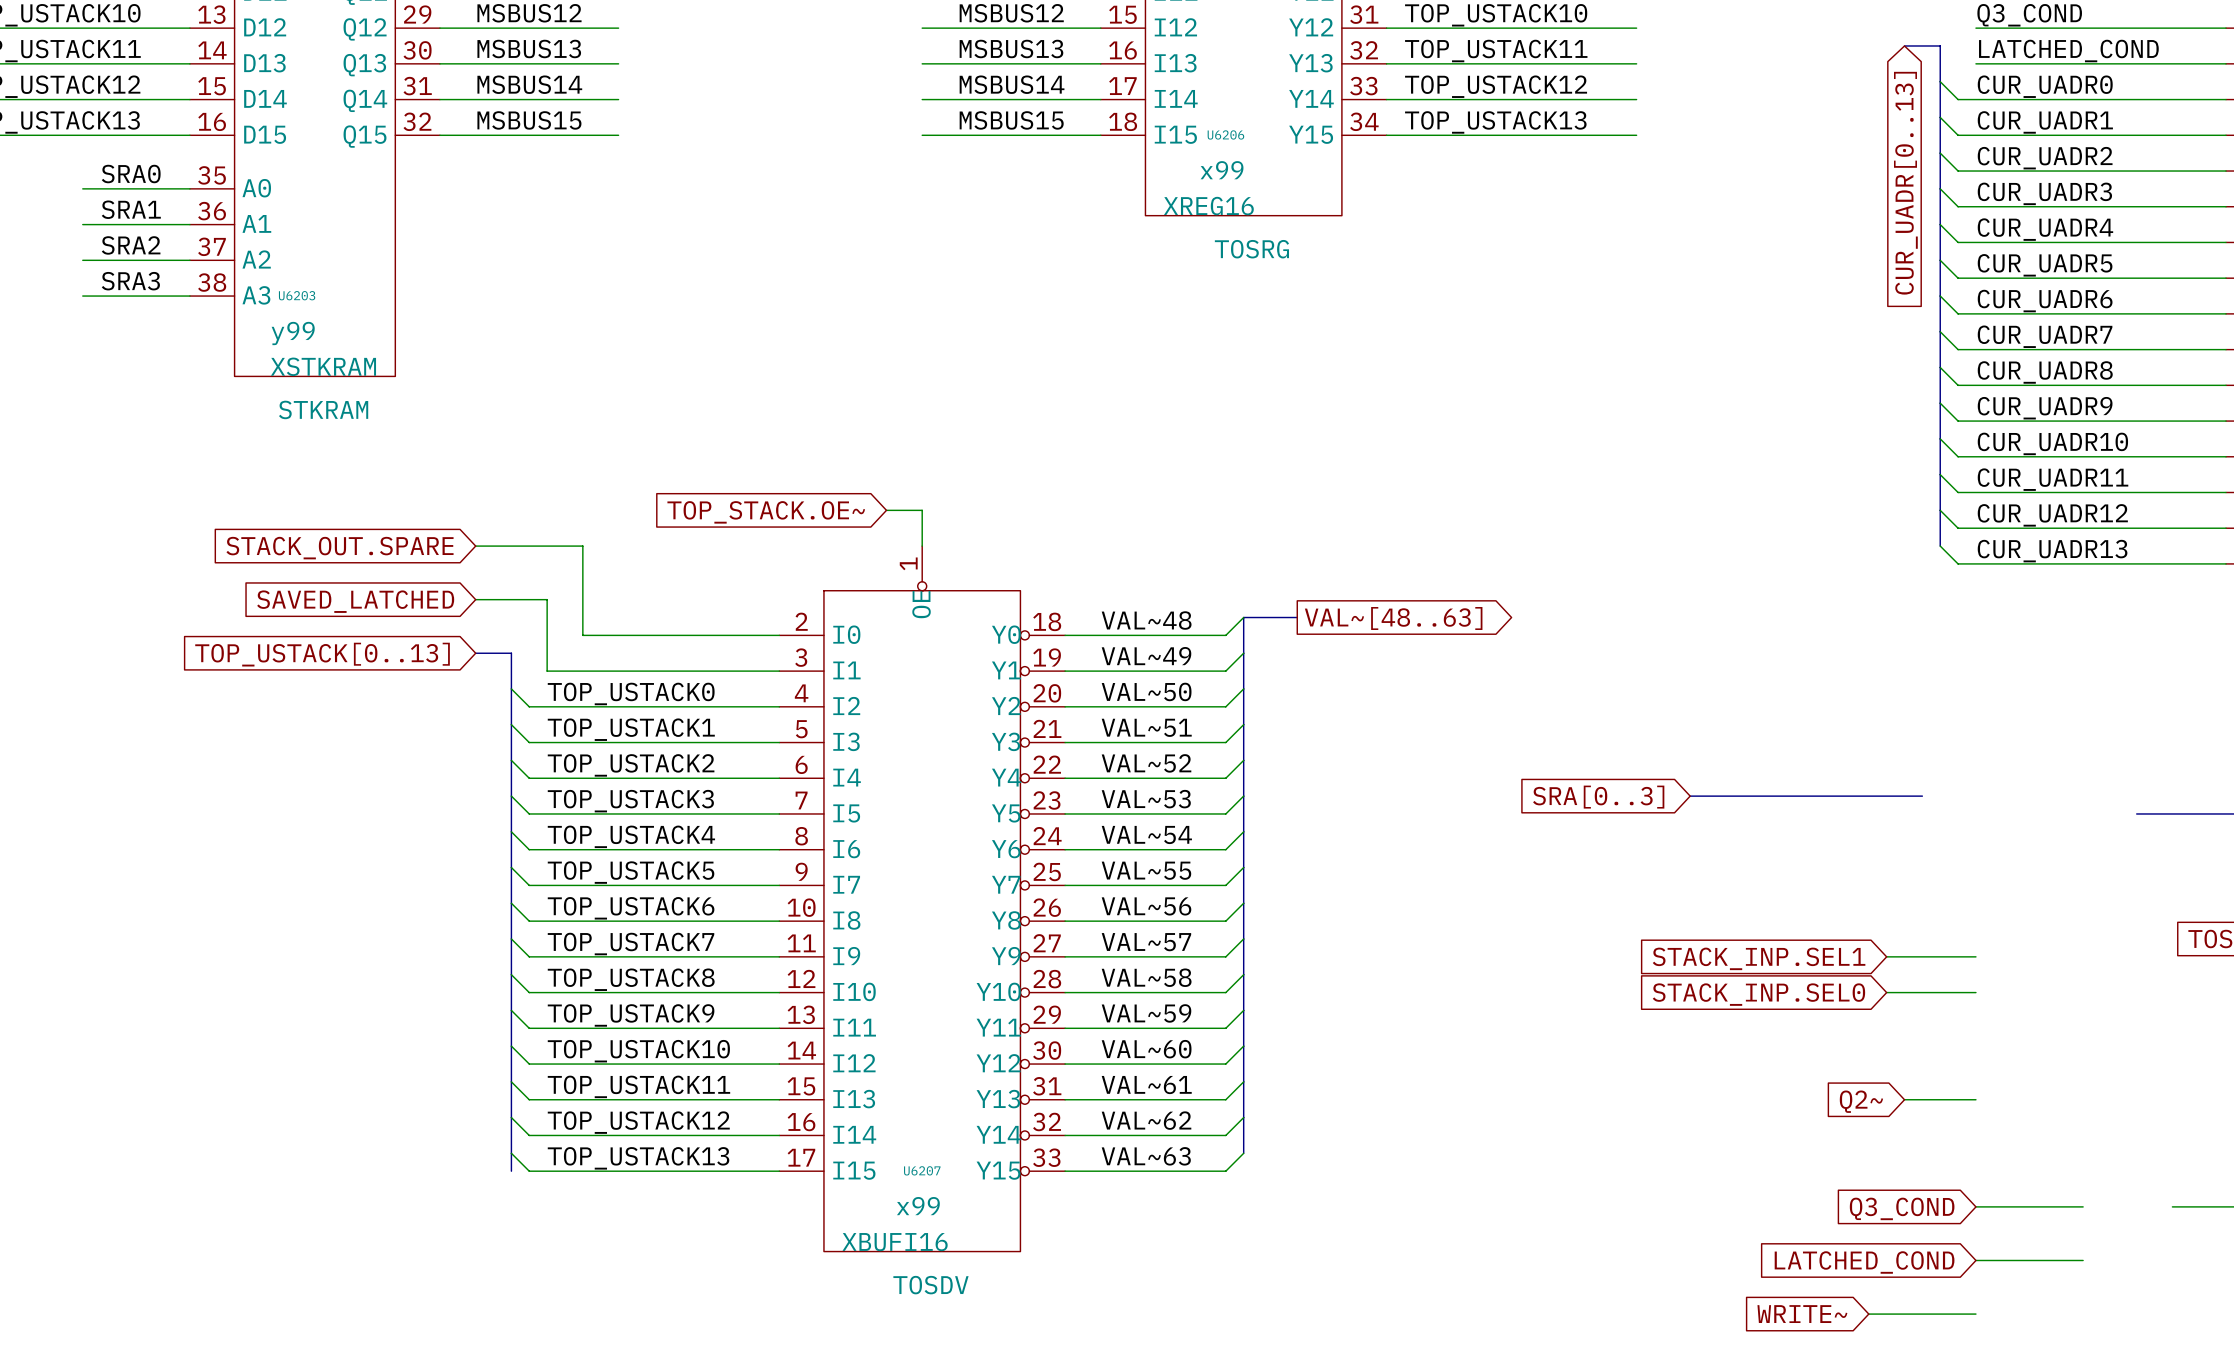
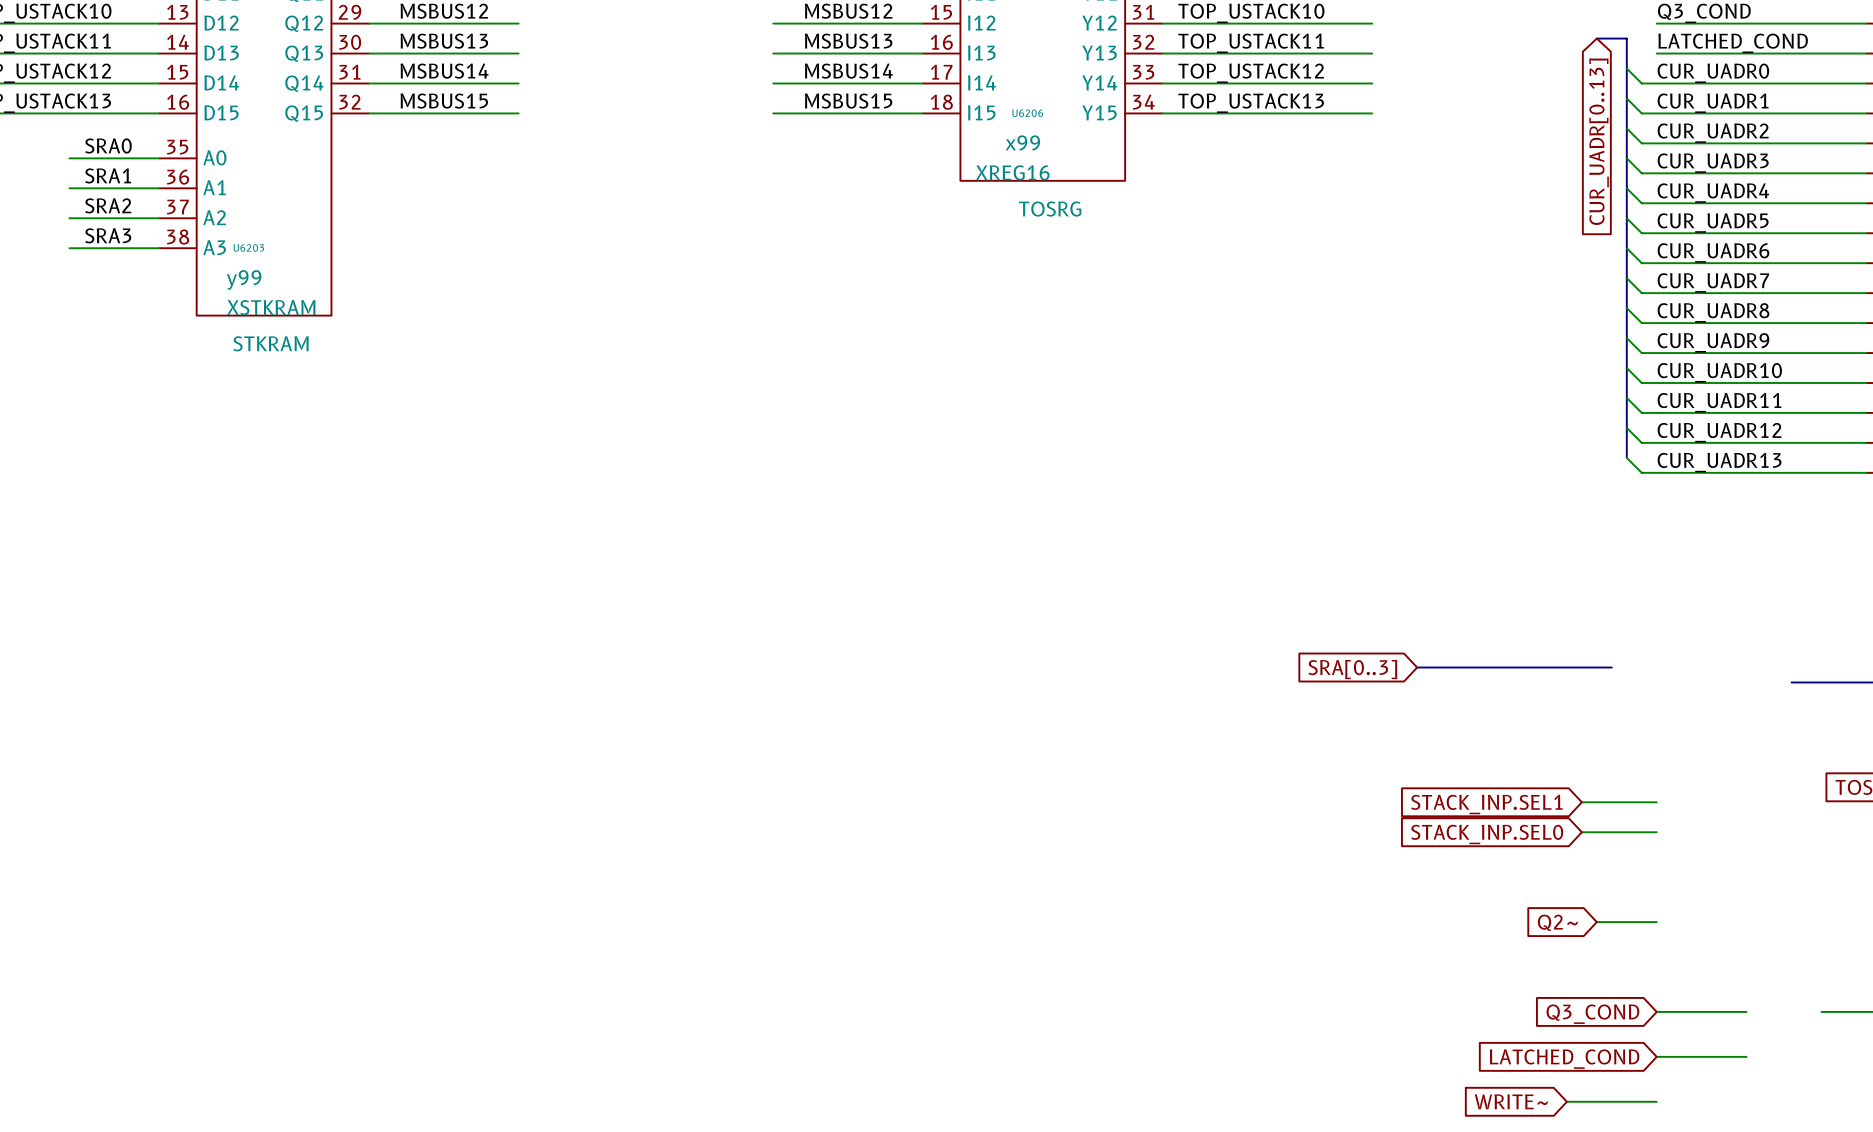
wire: (886, 510) (922, 510) (922, 546) -> none
global label: TOP_STACK.OE~ (766, 512) -> none
wire: (475, 546) (582, 546) (582, 635) (779, 635) -> none
global label: STACK_OUT.SPARE (340, 548) -> none
wire: (475, 599) (547, 599) (547, 671) (779, 671) -> none
global label: SAVED_LATCHED (355, 601) -> none
wire: (1243, 617) (1225, 635) (1065, 635) -> none
bus: (1297, 617) (1243, 617) (1243, 1153) -> none
global label: VAL~[48..63] (1393, 618) -> none
label: VAL~48 (1146, 620) -> none
bus: (475, 653) (511, 653) (511, 1171) -> none
wire: (1243, 653) (1225, 671) (1065, 671) -> none
global label: TOP_USTACK[0..13] (322, 654) -> none
label: VAL~49 (1146, 656) -> none
wire: (511, 688) (529, 706) (779, 706) -> none
wire: (1243, 688) (1225, 706) (1065, 706) -> none
label: VAL~50 (1146, 691) -> none
label: TOP_USTACK0 (631, 693) -> none
wire: (511, 724) (529, 742) (779, 742) -> none
wire: (1243, 724) (1225, 742) (1065, 742) -> none
label: VAL~51 (1146, 727) -> none
label: TOP_USTACK1 (631, 729) -> none
wire: (511, 760) (529, 778) (779, 778) -> none
wire: (1243, 760) (1225, 778) (1065, 778) -> none
label: VAL~52 (1146, 763) -> none
label: TOP_USTACK2 (631, 765) -> none
wire: (511, 796) (529, 813) (779, 813) -> none
wire: (1243, 796) (1225, 813) (1065, 813) -> none
label: VAL~53 (1146, 799) -> none
label: TOP_USTACK3 (630, 801) -> none
wire: (511, 831) (529, 849) (779, 849) -> none
wire: (1243, 831) (1225, 849) (1065, 849) -> none
label: VAL~54 (1146, 834) -> none
label: TOP_USTACK4 (631, 836) -> none
wire: (511, 867) (529, 885) (779, 885) -> none
wire: (1243, 867) (1225, 885) (1065, 885) -> none
label: VAL~55 (1146, 870) -> none
label: TOP_USTACK5 (631, 872) -> none
U6207: XBUFI16 (922, 898) -> none
wire: (511, 903) (529, 921) (779, 921) -> none
wire: (1243, 903) (1225, 921) (1065, 921) -> none
label: VAL~56 (1146, 906) -> none
label: TOP_USTACK6 (631, 908) -> none
wire: (511, 939) (529, 956) (779, 956) -> none
wire: (1243, 939) (1225, 956) (1065, 956) -> none
label: VAL~57 (1146, 942) -> none
label: TOP_USTACK7 (631, 944) -> none
wire: (511, 974) (529, 992) (779, 992) -> none
wire: (1243, 974) (1225, 992) (1065, 992) -> none
label: VAL~58 (1146, 977) -> none
label: TOP_USTACK8 (631, 979) -> none
wire: (511, 1010) (529, 1028) (779, 1028) -> none
wire: (1243, 1010) (1225, 1028) (1065, 1028) -> none
label: VAL~59 (1146, 1013) -> none
label: TOP_USTACK9 (631, 1015) -> none
wire: (511, 1046) (529, 1064) (779, 1064) -> none
wire: (1243, 1046) (1225, 1064) (1065, 1064) -> none
label: VAL~60 (1146, 1049) -> none
label: TOP_USTACK10 (638, 1051) -> none
wire: (511, 1081) (529, 1099) (779, 1099) -> none
wire: (1243, 1081) (1225, 1099) (1065, 1099) -> none
label: VAL~61 (1146, 1085) -> none
label: TOP_USTACK11 (638, 1086) -> none
wire: (511, 1117) (529, 1135) (779, 1135) -> none
wire: (1243, 1117) (1225, 1135) (1065, 1135) -> none
label: VAL~62 (1146, 1120) -> none
label: TOP_USTACK12 (638, 1122) -> none
wire: (511, 1153) (529, 1171) (779, 1171) -> none
wire: (1243, 1153) (1225, 1171) (1065, 1171) -> none
label: VAL~63 (1146, 1156) -> none
label: TOP_USTACK13 (638, 1158) -> none

